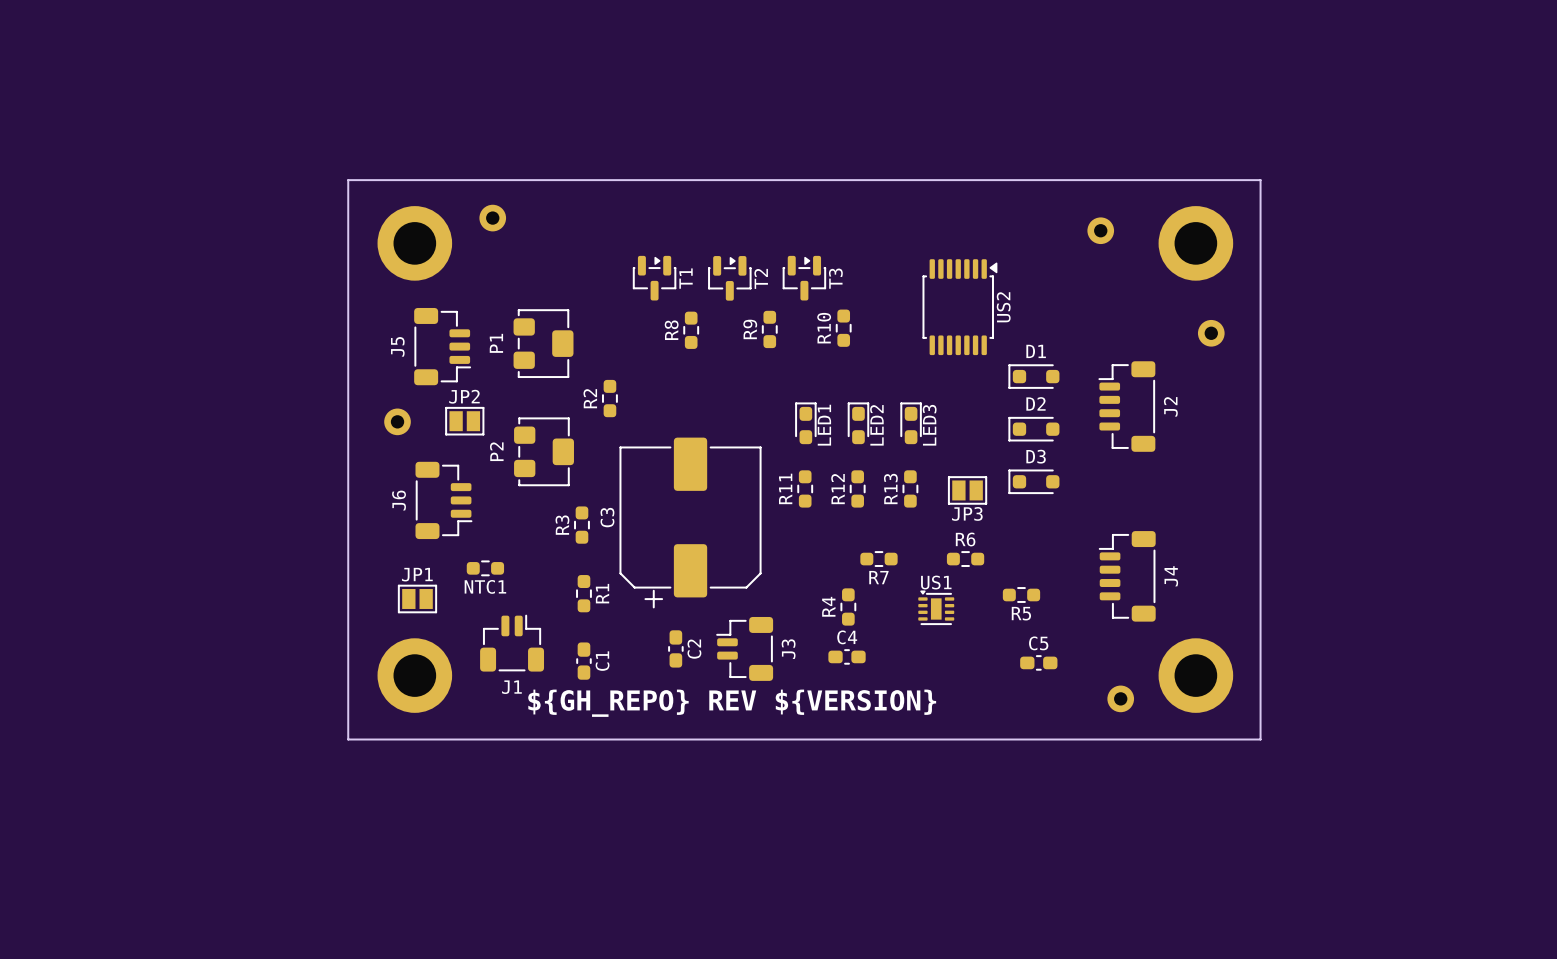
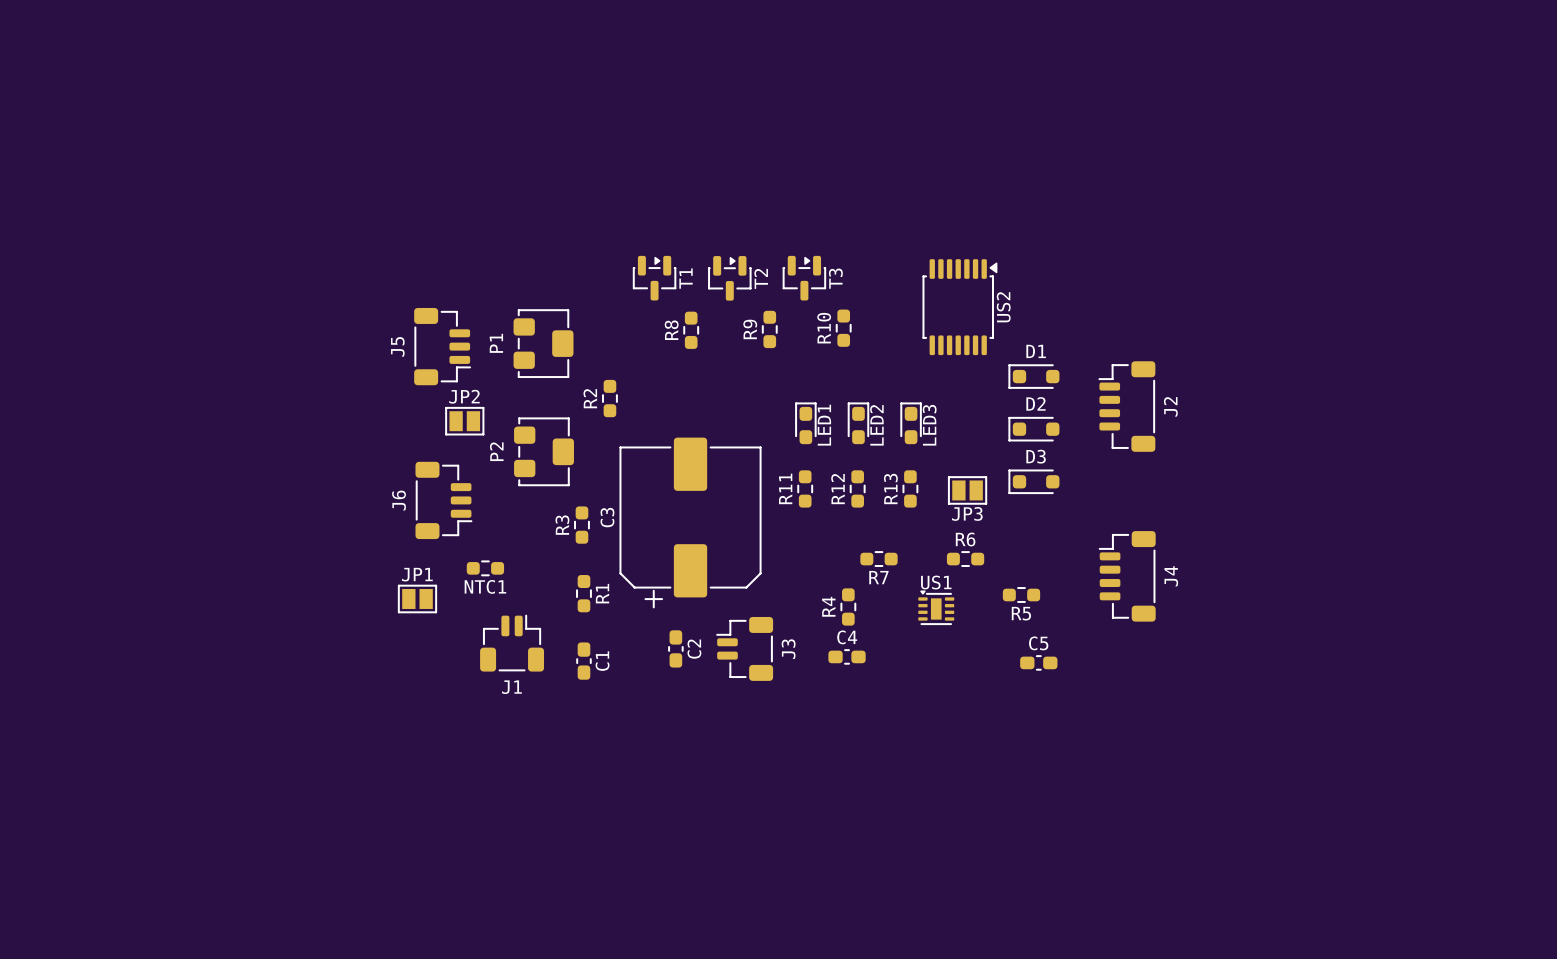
board edge: (348, 180) (1260, 180) (1260, 739) (348, 739) (348, 180) -> none
part: (492, 218) -> none
part: (1100, 230) -> none
part: (414, 243) -> none
part: (1195, 243) -> none
part: (1211, 333) -> none
part: (397, 421) -> none
part: (414, 675) -> none
part: (1195, 675) -> none
part: (1120, 698) -> none
text: ${GH_REPO} REV ${VERSION} (732, 703) -> none

